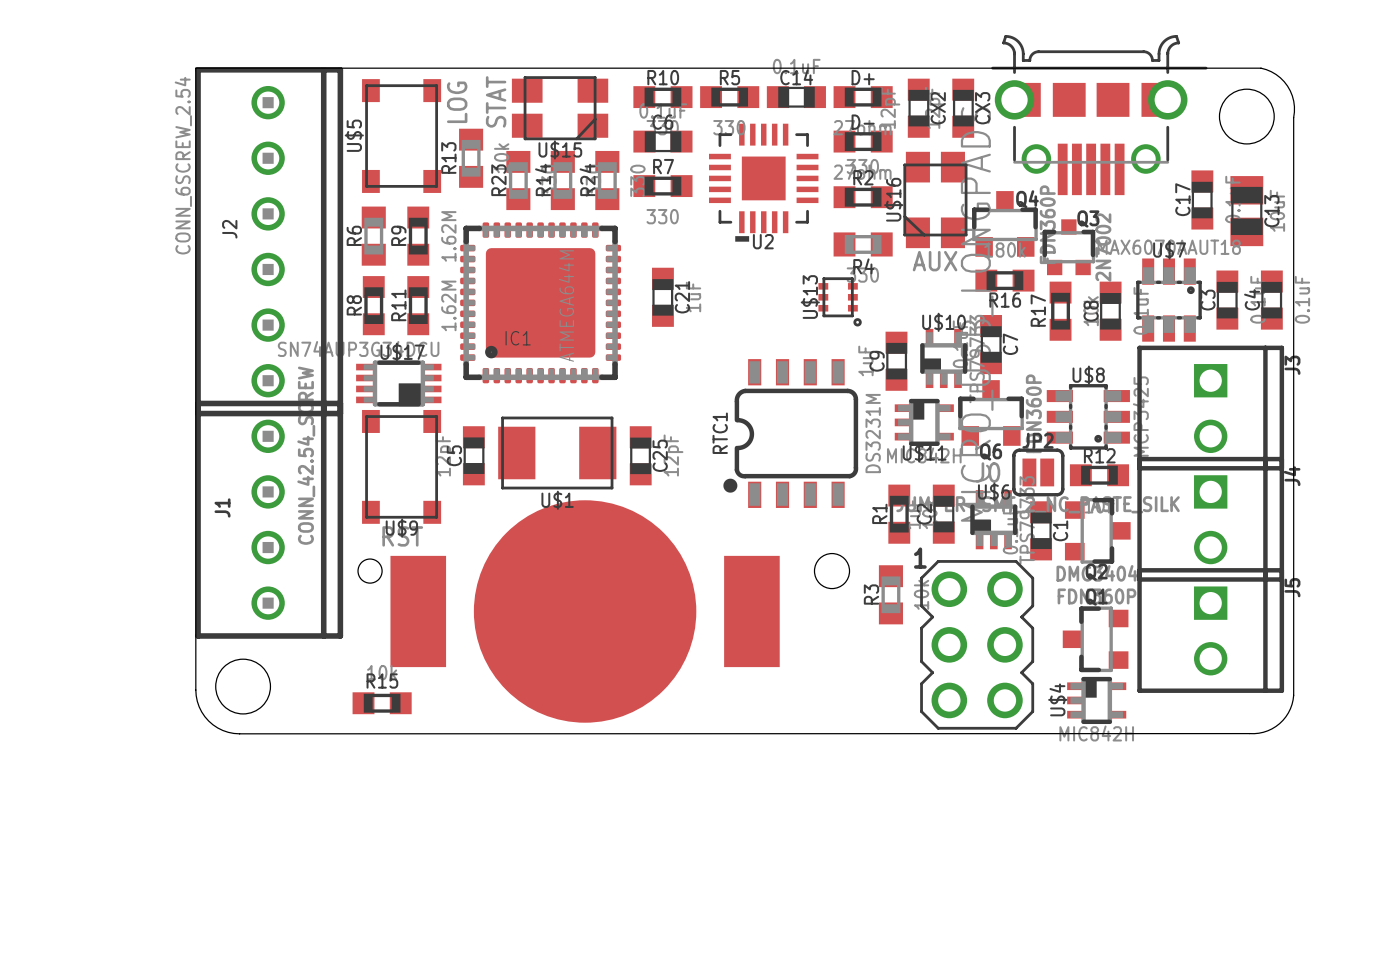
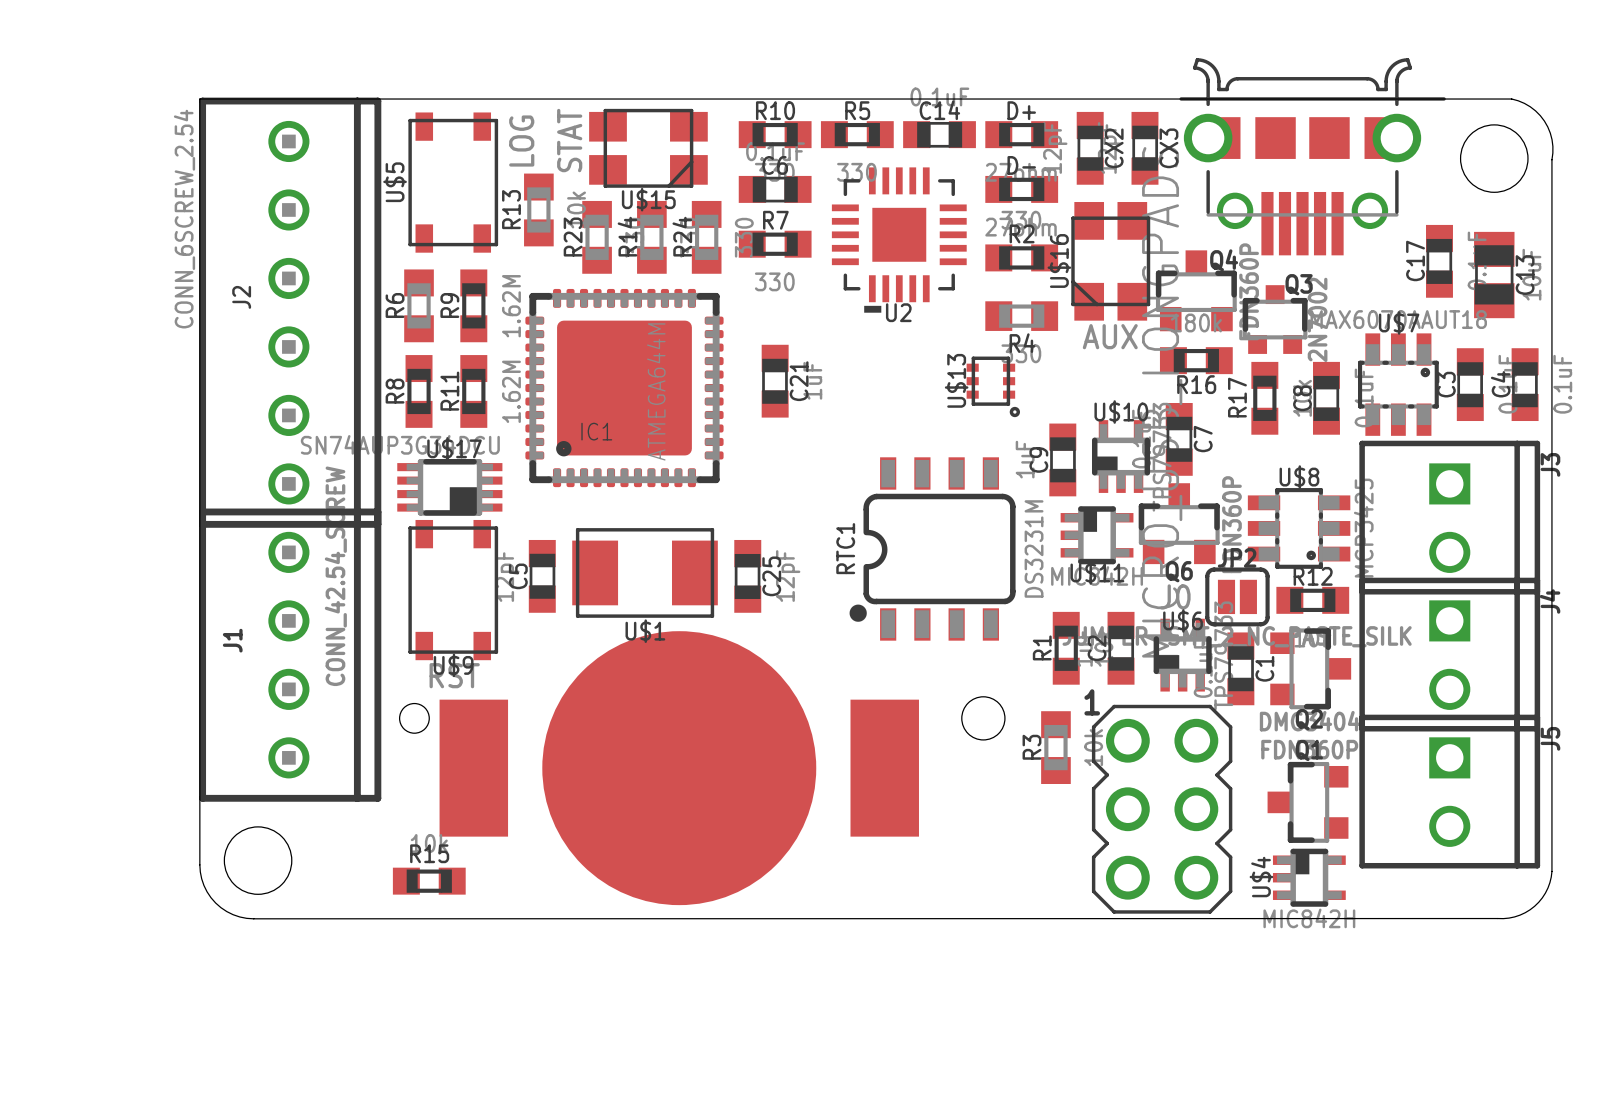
U$5 footprint: [362, 79, 442, 193] -> [408, 112, 499, 253]
U$9 footprint: [362, 409, 442, 524] -> [408, 519, 499, 661]

